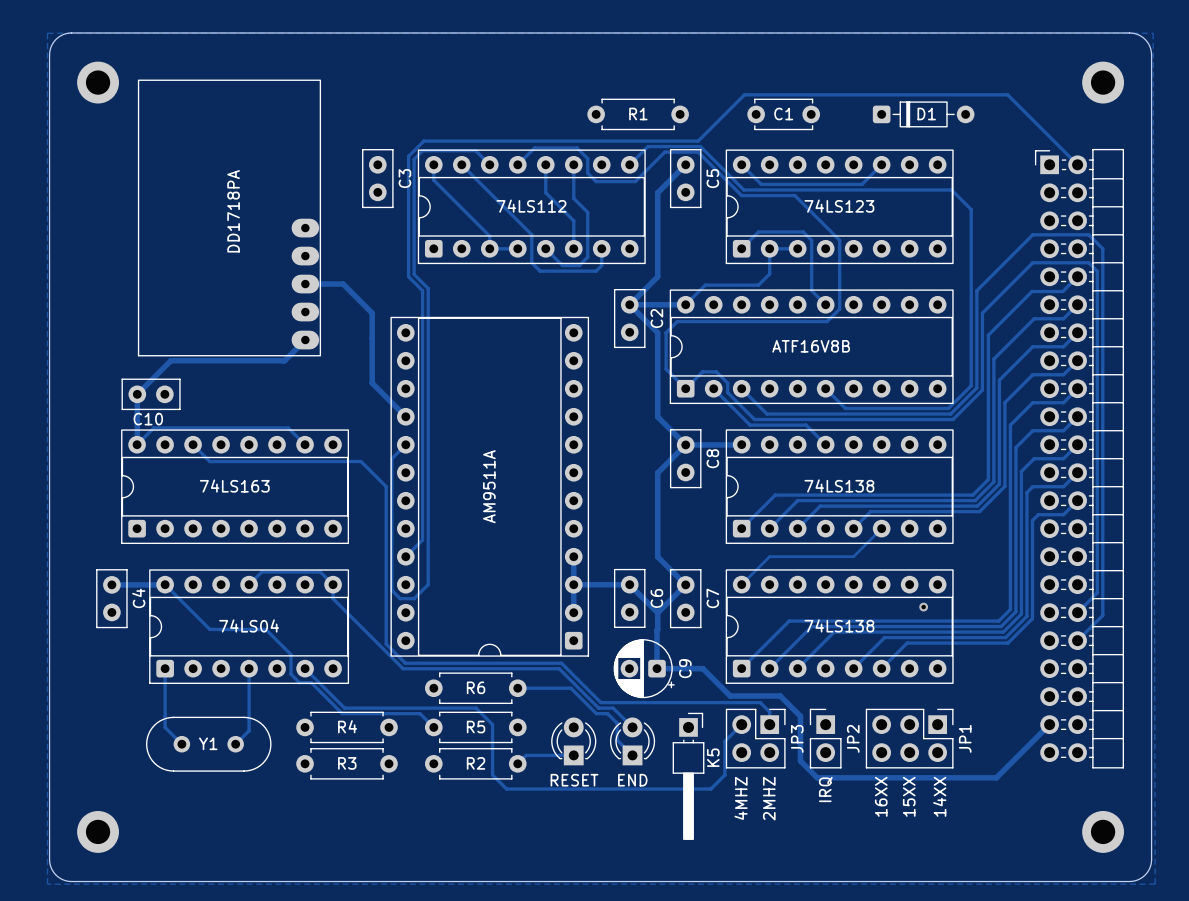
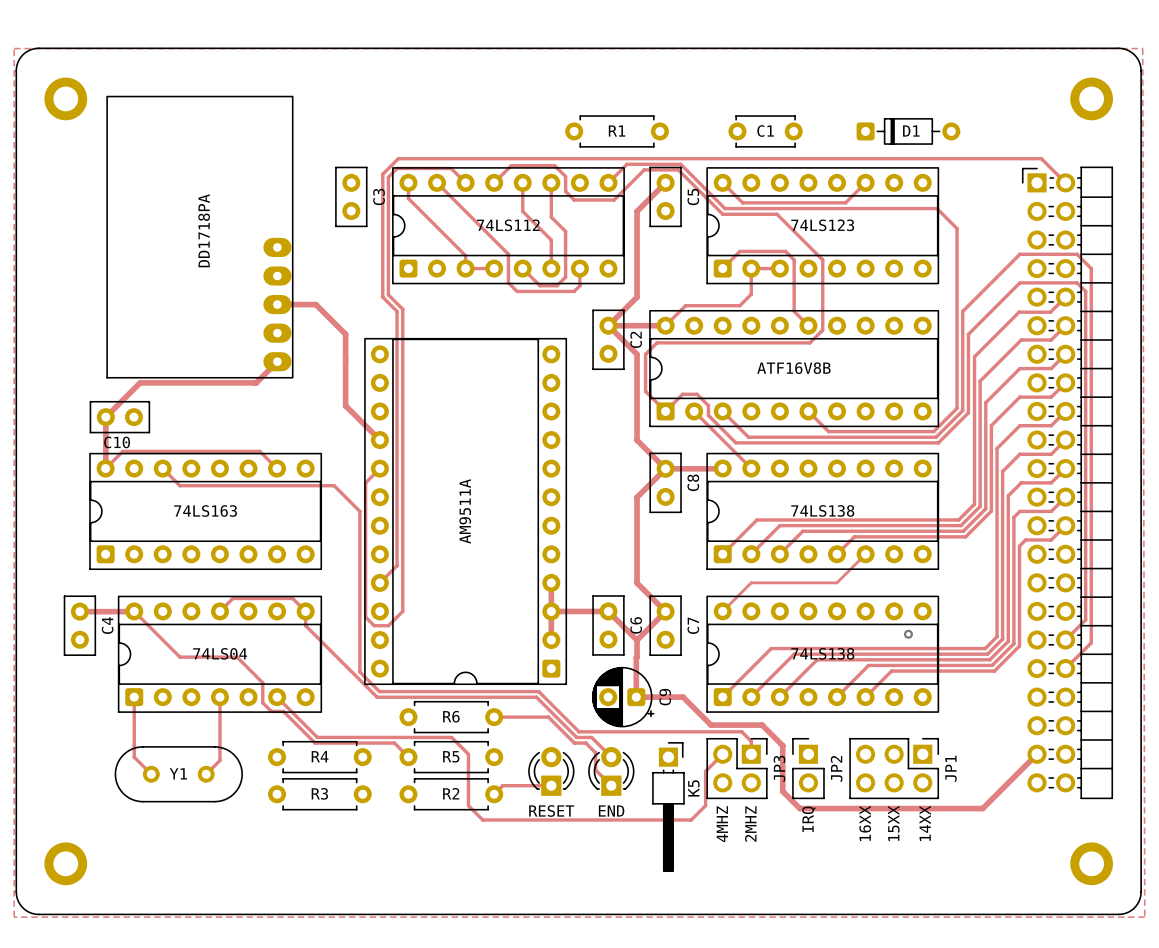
track: (698, 141) (744, 94) (1007, 94) (1053, 141) -> (678, 158) (1041, 158)
track: (713, 388) (750, 425) (806, 425) (825, 444) -> (694, 411) (751, 468)

